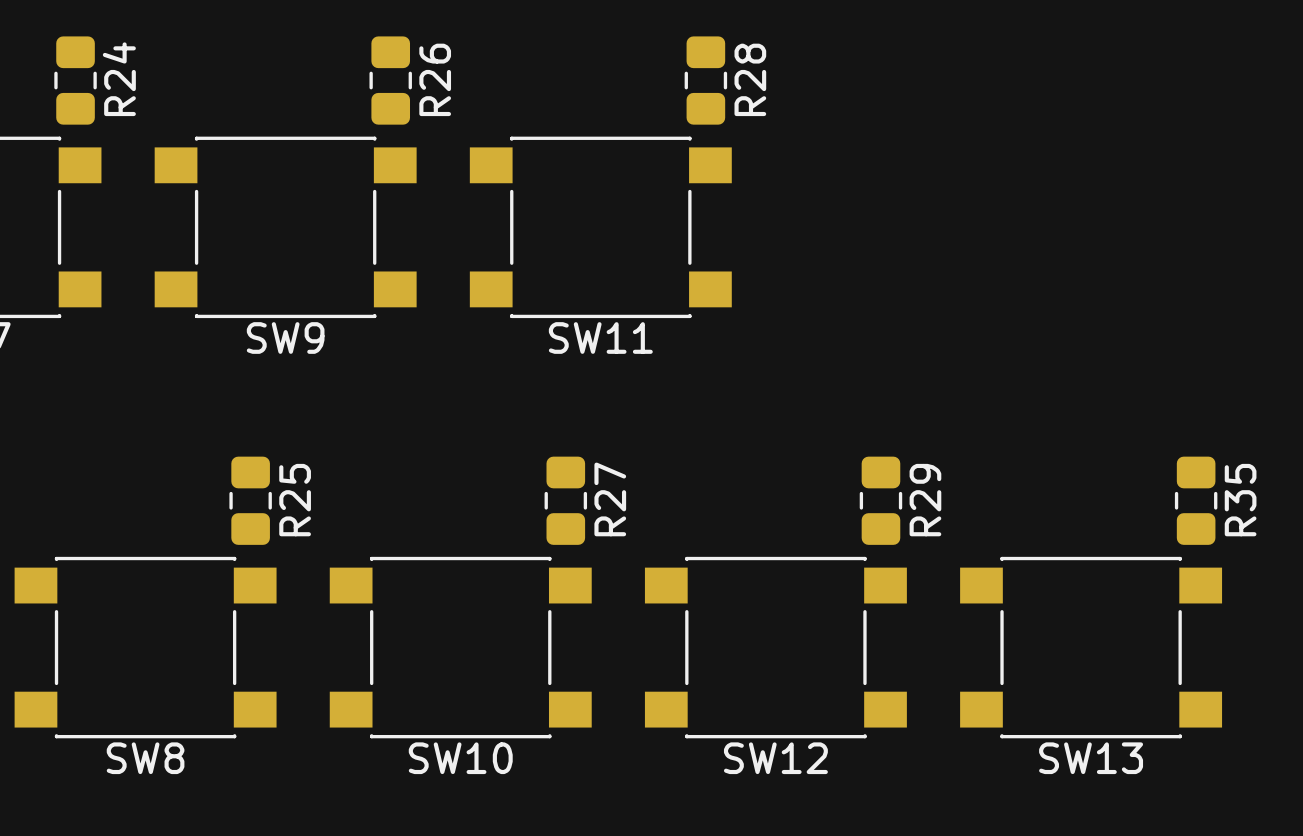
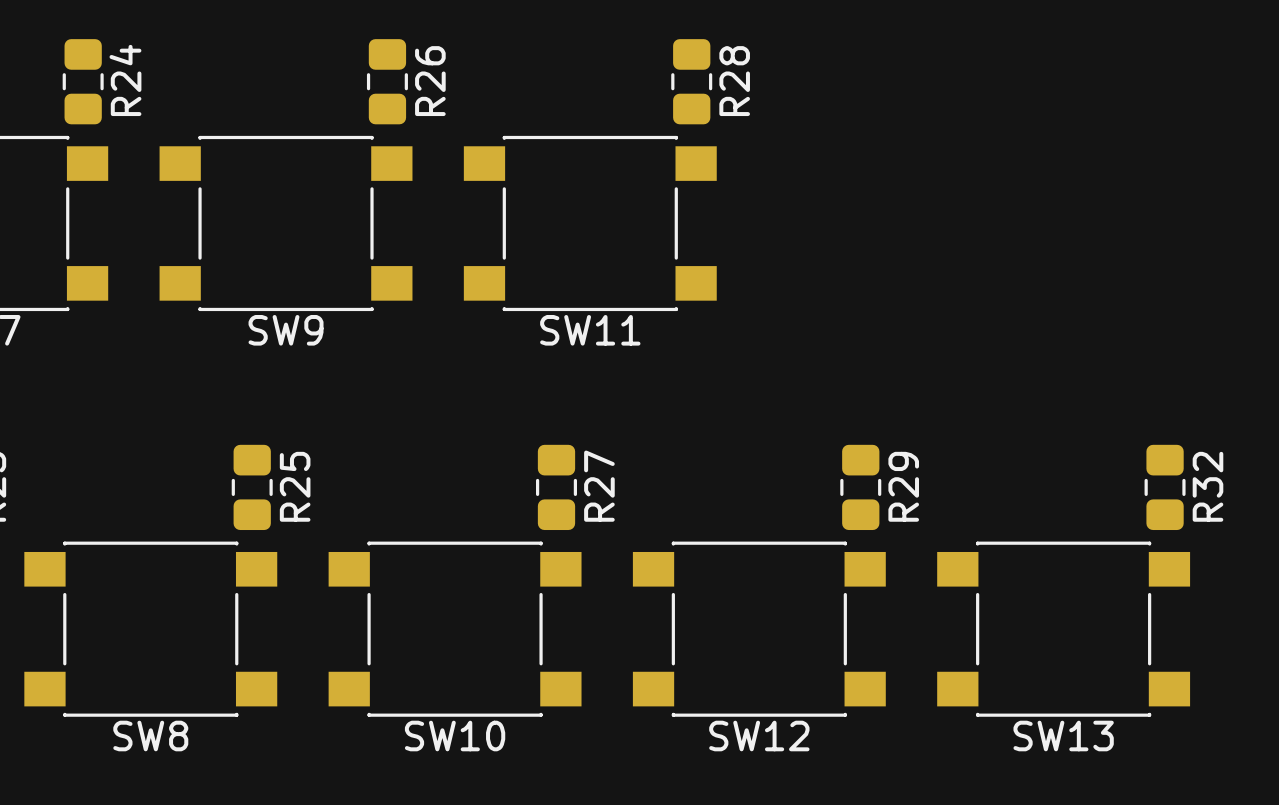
R35 name: R35 (1240, 500) -> R32 (1207, 486)

